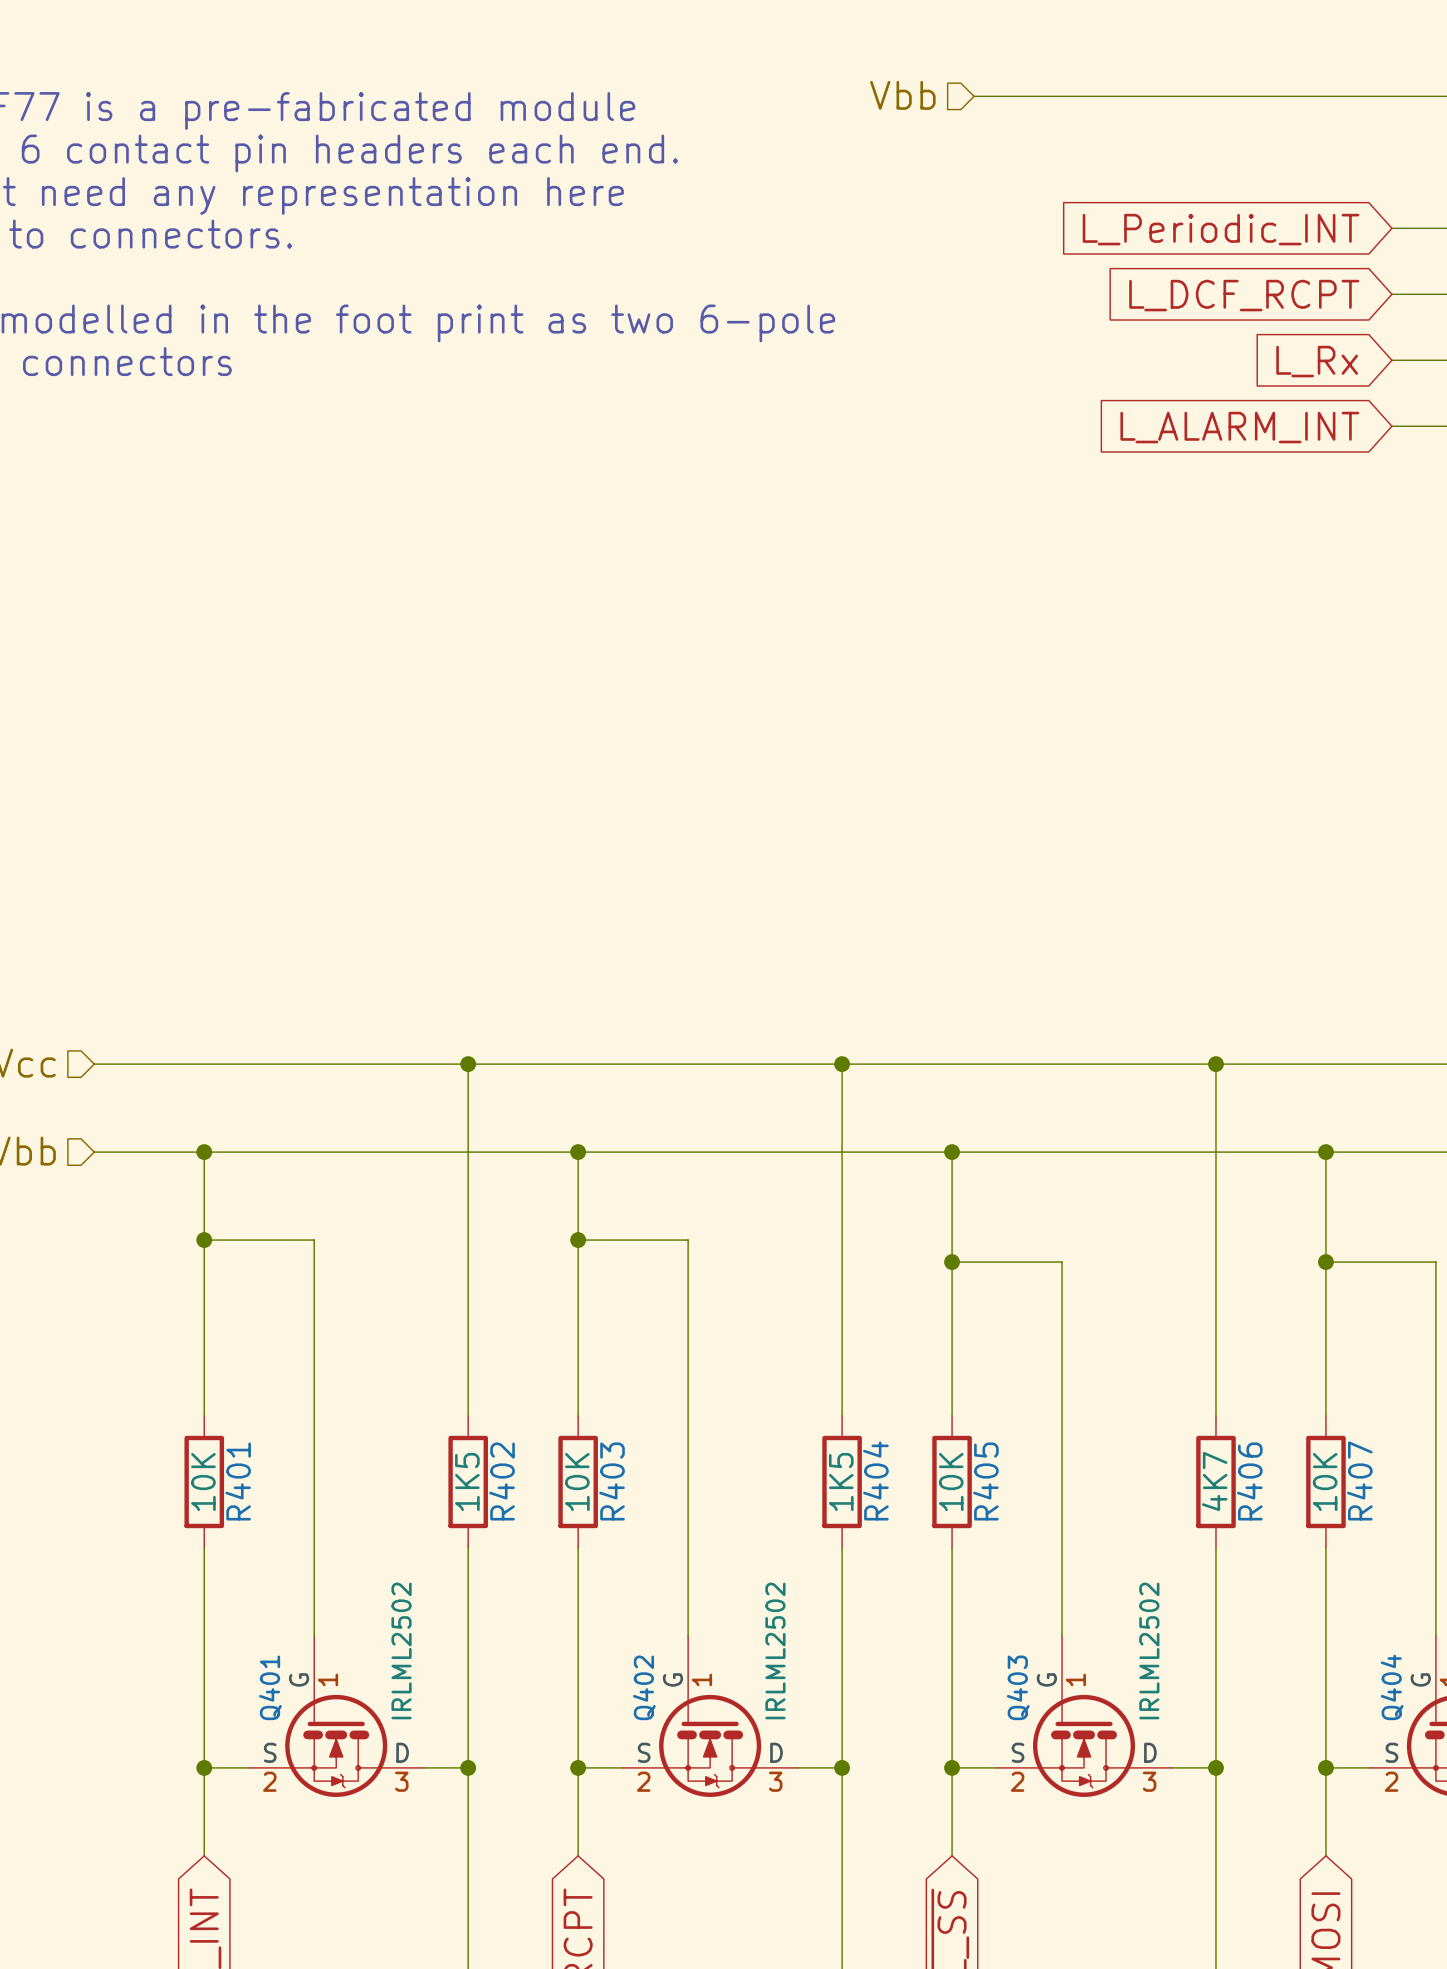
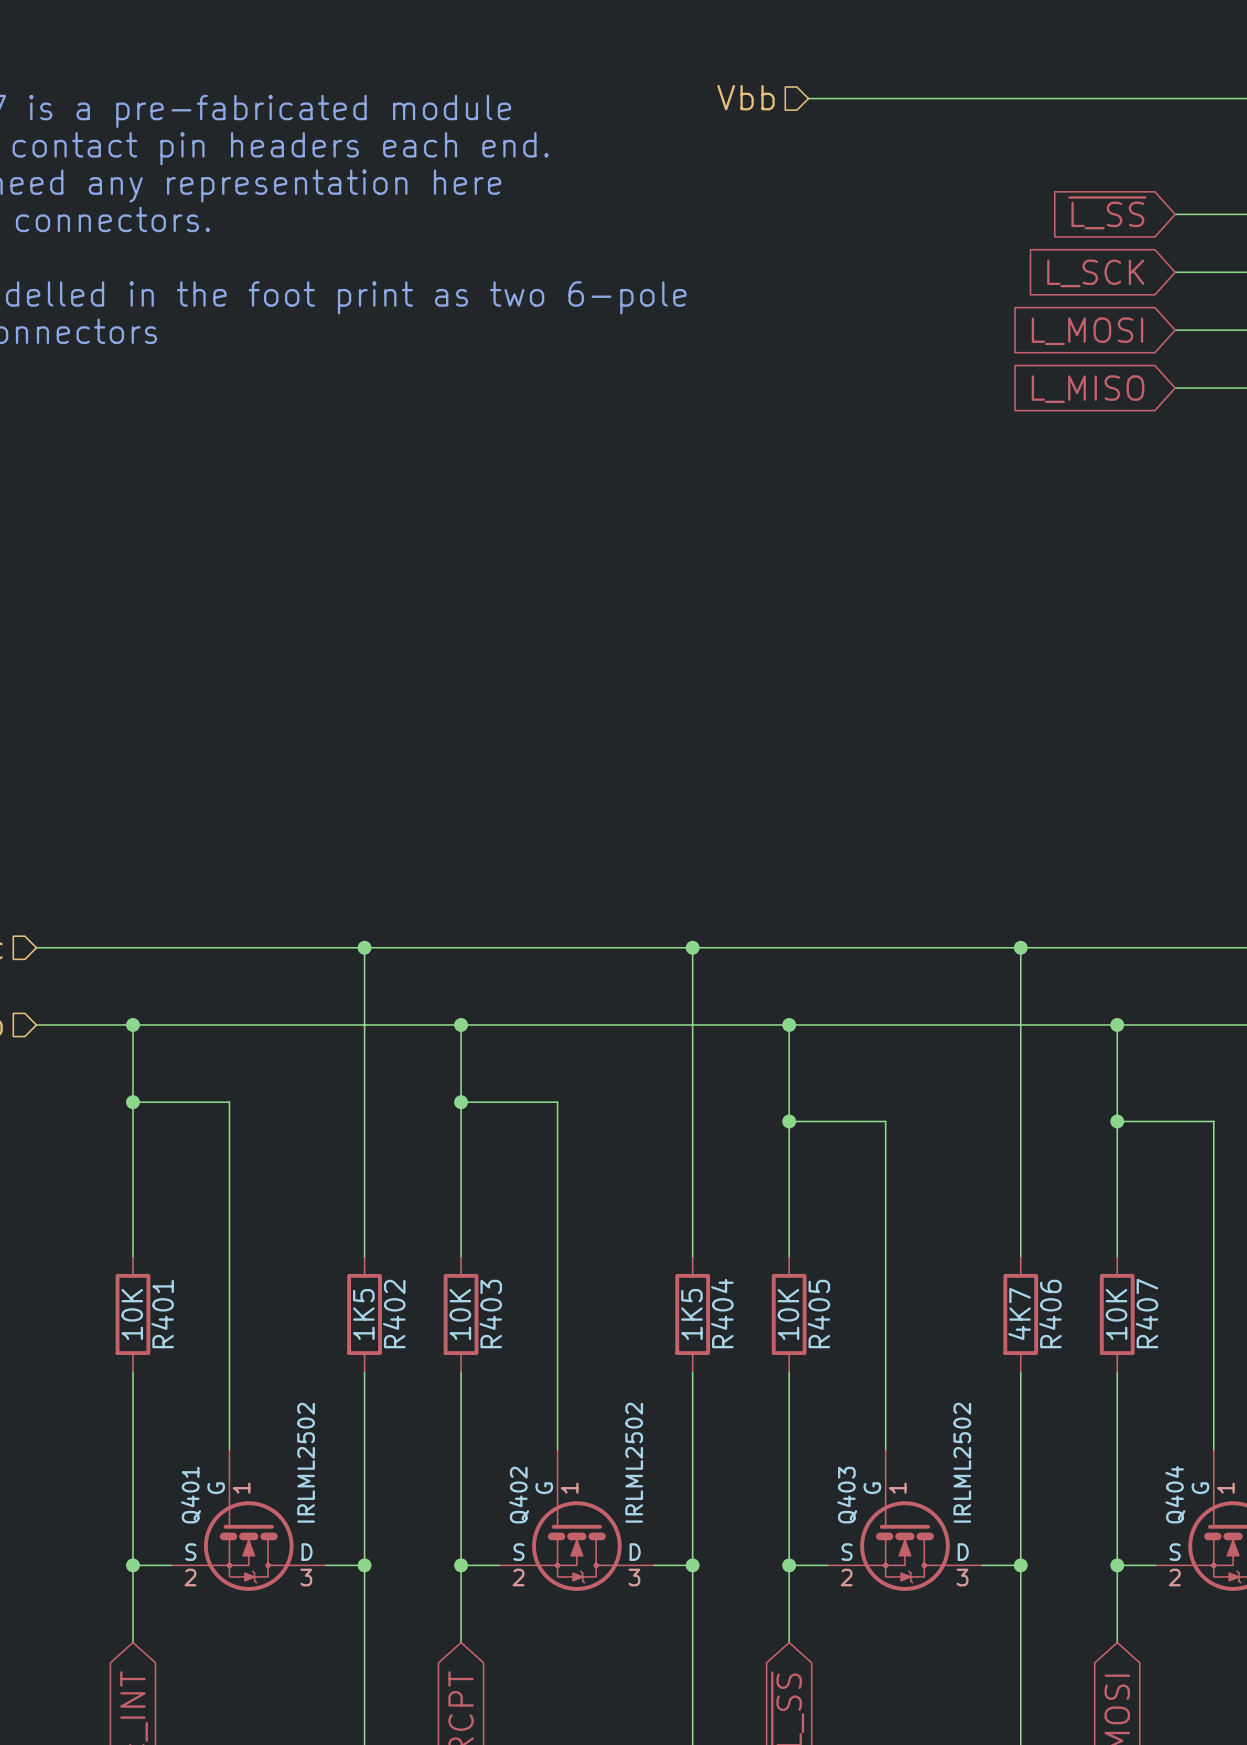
global label: L_Periodic_INT (1221, 229) -> ~{L_SS} (1107, 212)
global label: L_DCF_RCPT (1244, 295) -> L_SCK (1095, 273)
global label: L_Rx (1317, 361) -> L_MOSI (1087, 331)
global label: L_ALARM_INT (1239, 427) -> L_MISO (1088, 389)

